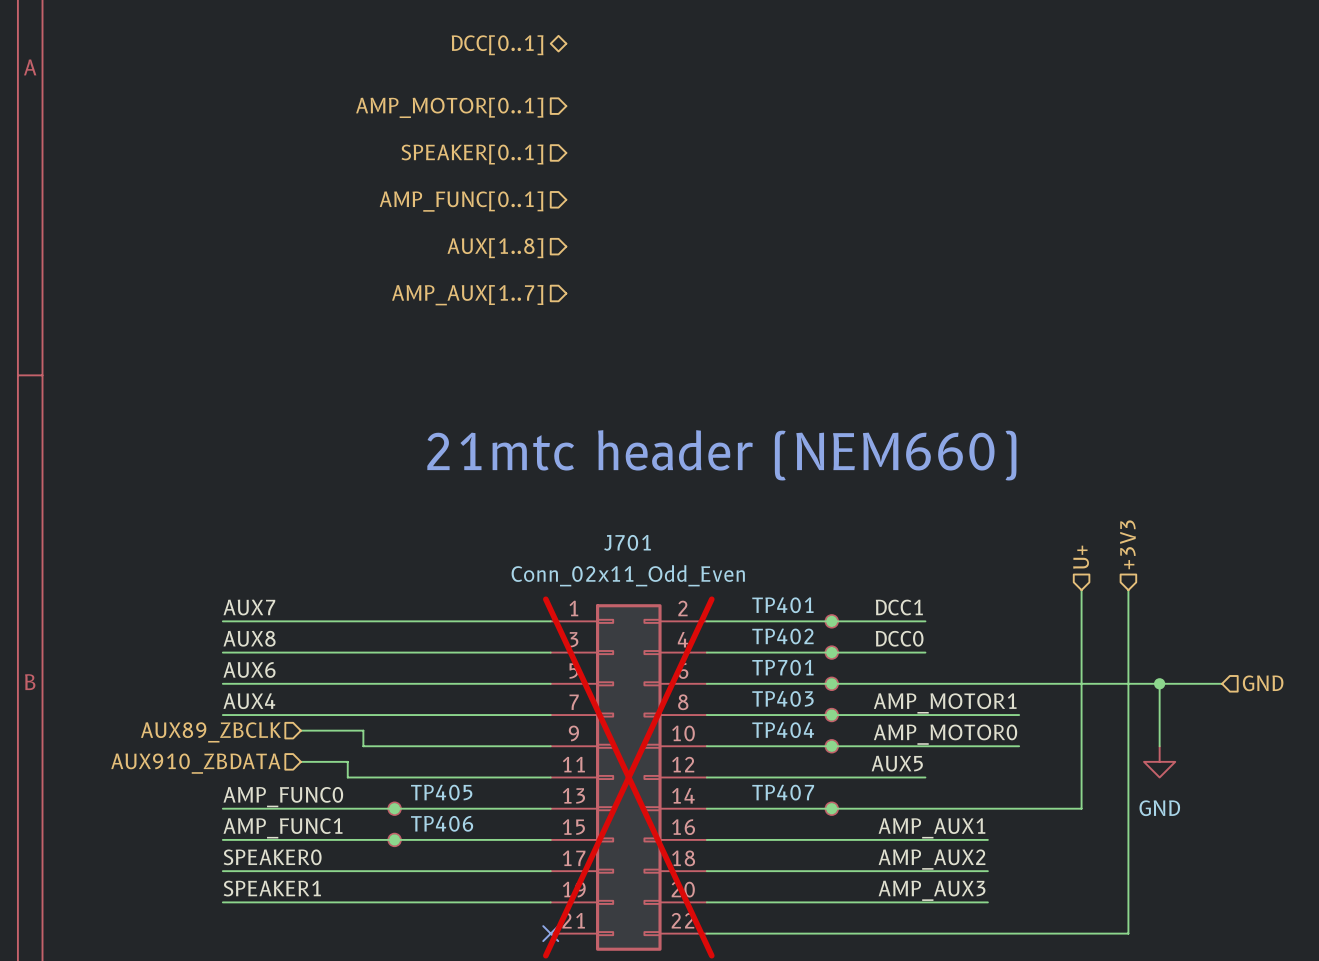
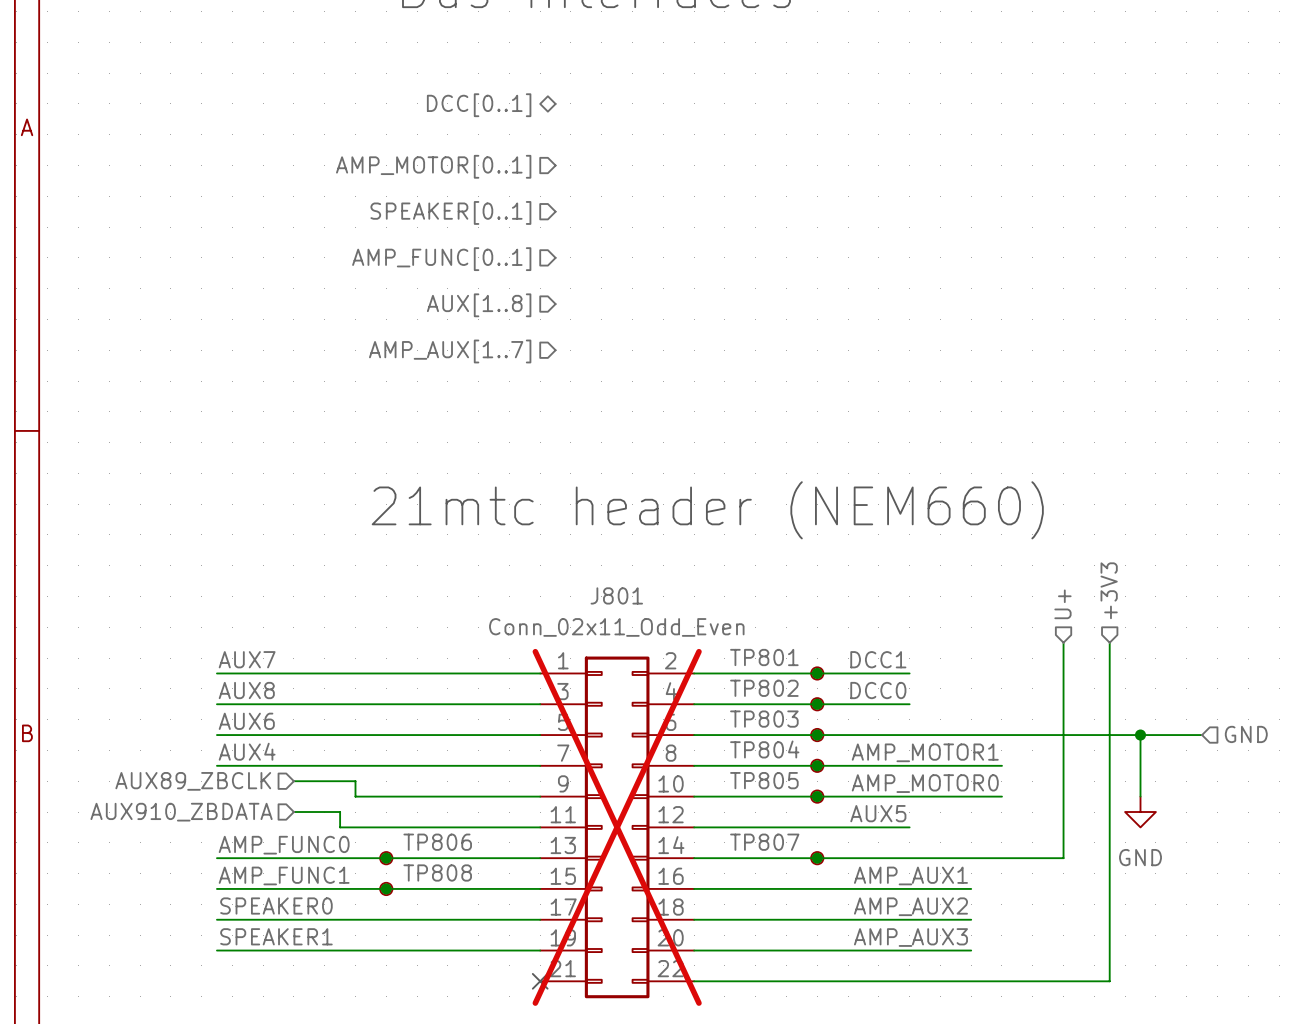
J701 name: J701 (627, 542) -> J801 (616, 595)
TP401 name: TP401 (782, 605) -> TP801 (764, 657)
TP402 name: TP402 (782, 636) -> TP802 (764, 688)
TP701 name: TP701 (782, 667) -> TP803 (764, 719)
TP403 name: TP403 (782, 698) -> TP804 (764, 749)
TP404 name: TP404 (783, 730) -> TP805 (764, 780)
TP405 name: TP405 (441, 792) -> TP806 (437, 842)
TP407 name: TP407 (783, 792) -> TP807 (764, 842)
TP406 name: TP406 (442, 823) -> TP808 (437, 872)

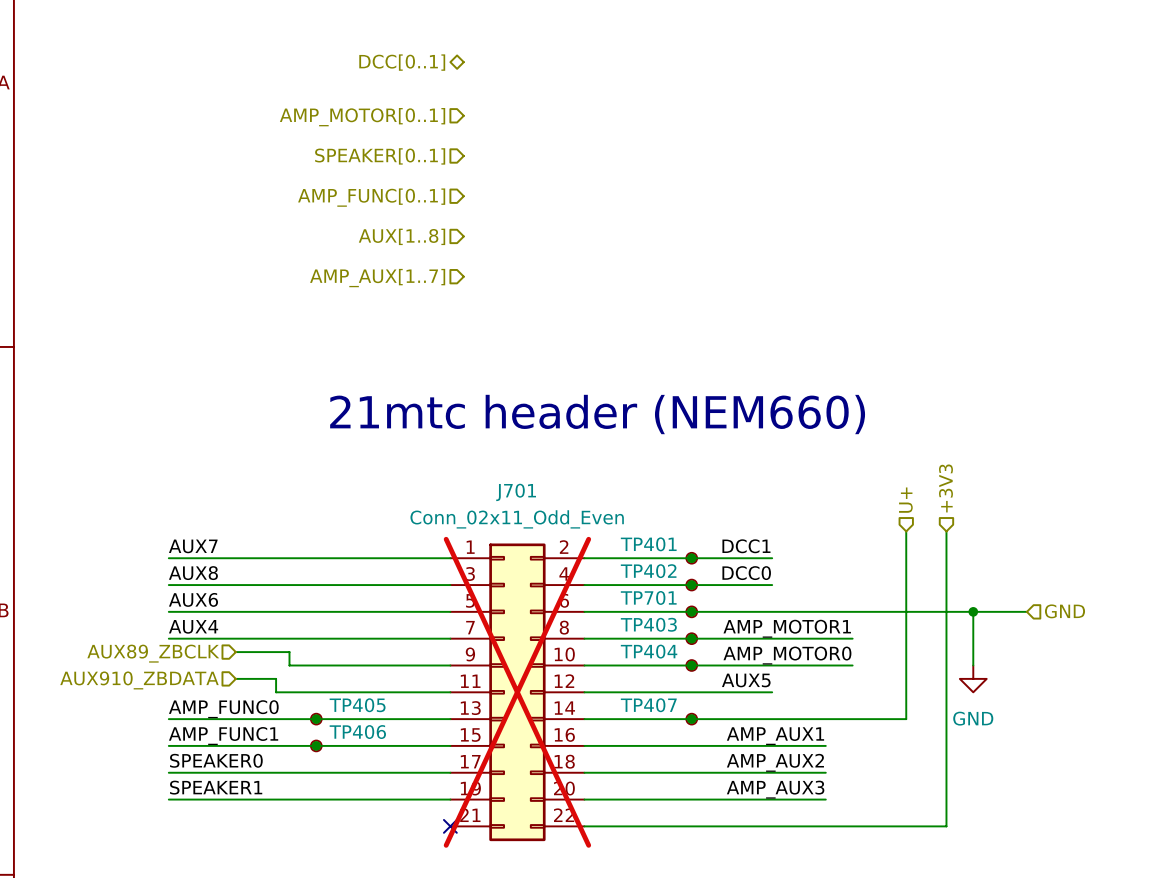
J801 name: J801 (616, 595) -> J701 (516, 492)
TP801 name: TP801 (764, 657) -> TP401 (648, 544)
TP802 name: TP802 (764, 688) -> TP402 (648, 571)
TP803 name: TP803 (764, 719) -> TP701 (648, 597)
TP804 name: TP804 (764, 749) -> TP403 (648, 624)
TP805 name: TP805 (764, 780) -> TP404 (649, 651)
TP806 name: TP806 (437, 842) -> TP405 (357, 705)
TP807 name: TP807 (764, 842) -> TP407 (648, 705)
TP808 name: TP808 (437, 872) -> TP406 (357, 732)

